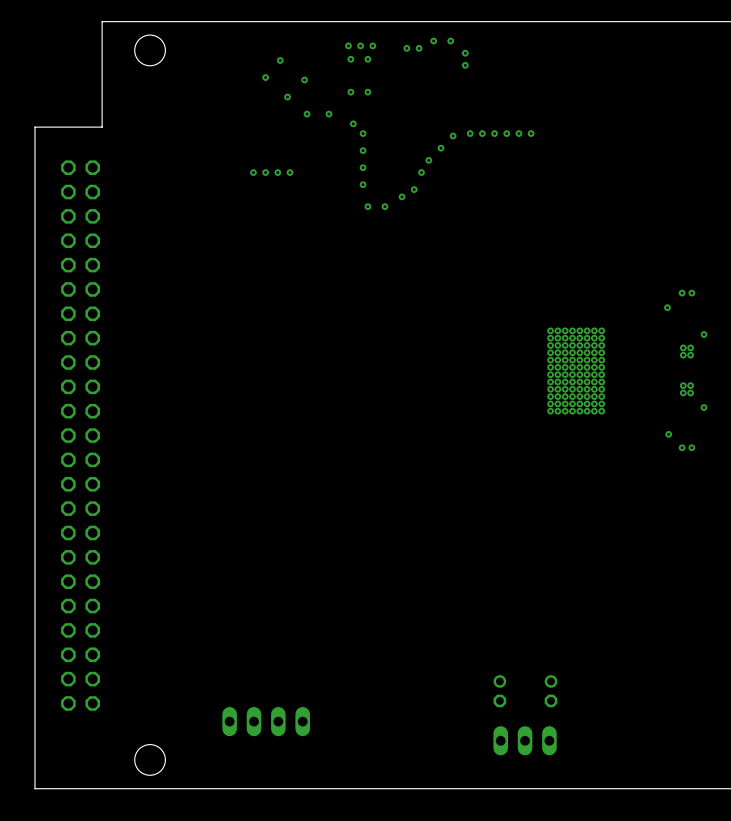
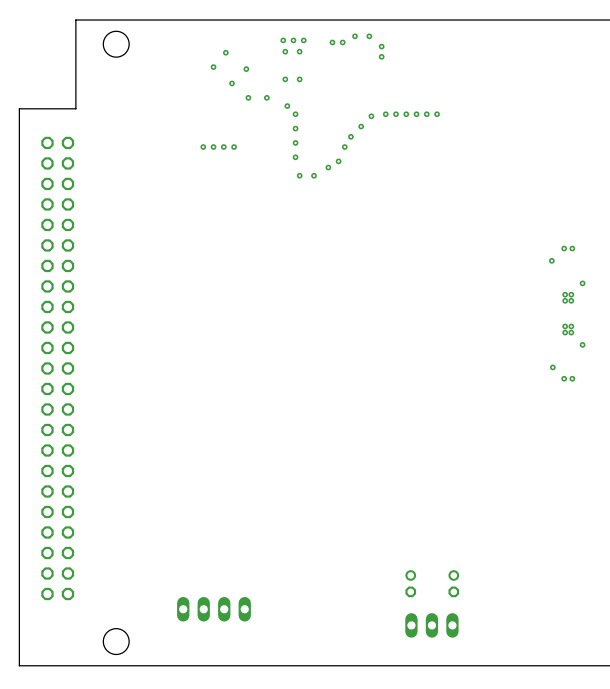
via: (550, 330) -> none
via: (557, 330) -> none
via: (565, 330) -> none
via: (572, 330) -> none
via: (579, 330) -> none
via: (587, 330) -> none
via: (594, 330) -> none
via: (601, 330) -> none
via: (550, 338) -> none
via: (557, 338) -> none
via: (565, 338) -> none
via: (572, 338) -> none
via: (579, 338) -> none
via: (587, 338) -> none
via: (594, 338) -> none
via: (601, 338) -> none
via: (550, 345) -> none
via: (557, 345) -> none
via: (565, 345) -> none
via: (572, 345) -> none
via: (579, 345) -> none
via: (587, 345) -> none
via: (594, 345) -> none
via: (601, 345) -> none
via: (550, 352) -> none
via: (557, 352) -> none
via: (565, 352) -> none
via: (572, 352) -> none
via: (579, 352) -> none
via: (587, 352) -> none
via: (594, 352) -> none
via: (601, 352) -> none
via: (550, 360) -> none
via: (557, 360) -> none
via: (565, 360) -> none
via: (572, 360) -> none
via: (579, 360) -> none
via: (587, 360) -> none
via: (594, 360) -> none
via: (601, 360) -> none
via: (550, 367) -> none
via: (557, 367) -> none
via: (565, 367) -> none
via: (572, 367) -> none
via: (579, 367) -> none
via: (587, 367) -> none
via: (594, 367) -> none
via: (601, 367) -> none
via: (550, 374) -> none
via: (557, 374) -> none
via: (565, 374) -> none
via: (572, 374) -> none
via: (579, 374) -> none
via: (587, 374) -> none
via: (594, 374) -> none
via: (601, 374) -> none
via: (550, 381) -> none
via: (557, 381) -> none
via: (565, 381) -> none
via: (572, 381) -> none
via: (579, 381) -> none
via: (587, 381) -> none
via: (594, 381) -> none
via: (601, 381) -> none
via: (550, 389) -> none
via: (557, 389) -> none
via: (565, 389) -> none
via: (572, 389) -> none
via: (579, 389) -> none
via: (587, 389) -> none
via: (594, 389) -> none
via: (601, 389) -> none
via: (550, 396) -> none
via: (557, 396) -> none
via: (565, 396) -> none
via: (572, 396) -> none
via: (579, 396) -> none
via: (587, 396) -> none
via: (594, 396) -> none
via: (601, 396) -> none
via: (550, 403) -> none
via: (557, 403) -> none
via: (565, 403) -> none
via: (572, 403) -> none
via: (579, 403) -> none
via: (587, 403) -> none
via: (594, 403) -> none
via: (601, 403) -> none
via: (550, 411) -> none
via: (557, 411) -> none
via: (565, 411) -> none
via: (572, 411) -> none
via: (579, 411) -> none
via: (587, 411) -> none
via: (594, 411) -> none
via: (601, 411) -> none

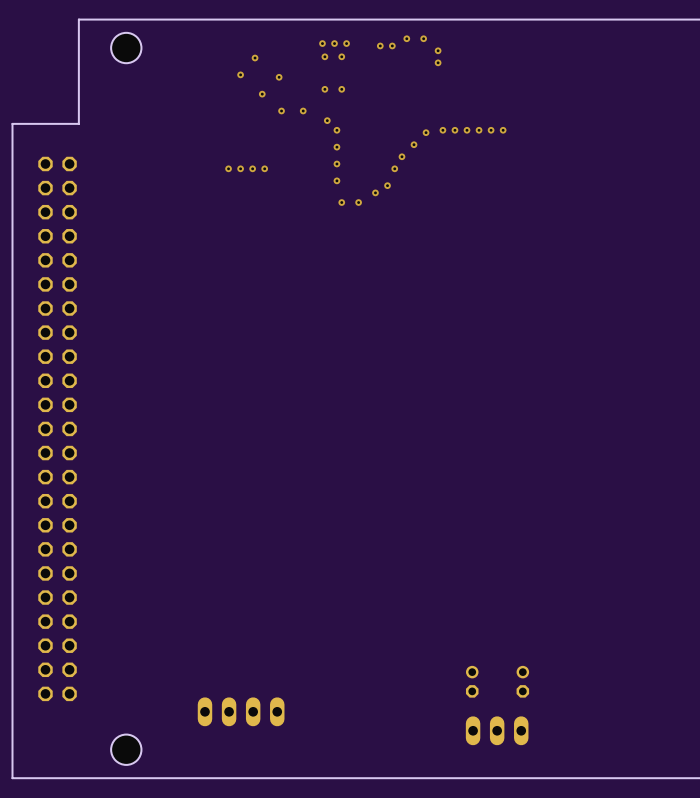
via: (564, 248) -> none
via: (572, 248) -> none
via: (551, 260) -> none
via: (582, 283) -> none
via: (565, 294) -> none
via: (571, 294) -> none
via: (565, 300) -> none
via: (571, 300) -> none
via: (565, 326) -> none
via: (571, 326) -> none
via: (565, 332) -> none
via: (571, 332) -> none
via: (582, 344) -> none
via: (552, 367) -> none
via: (564, 378) -> none
via: (572, 378) -> none

